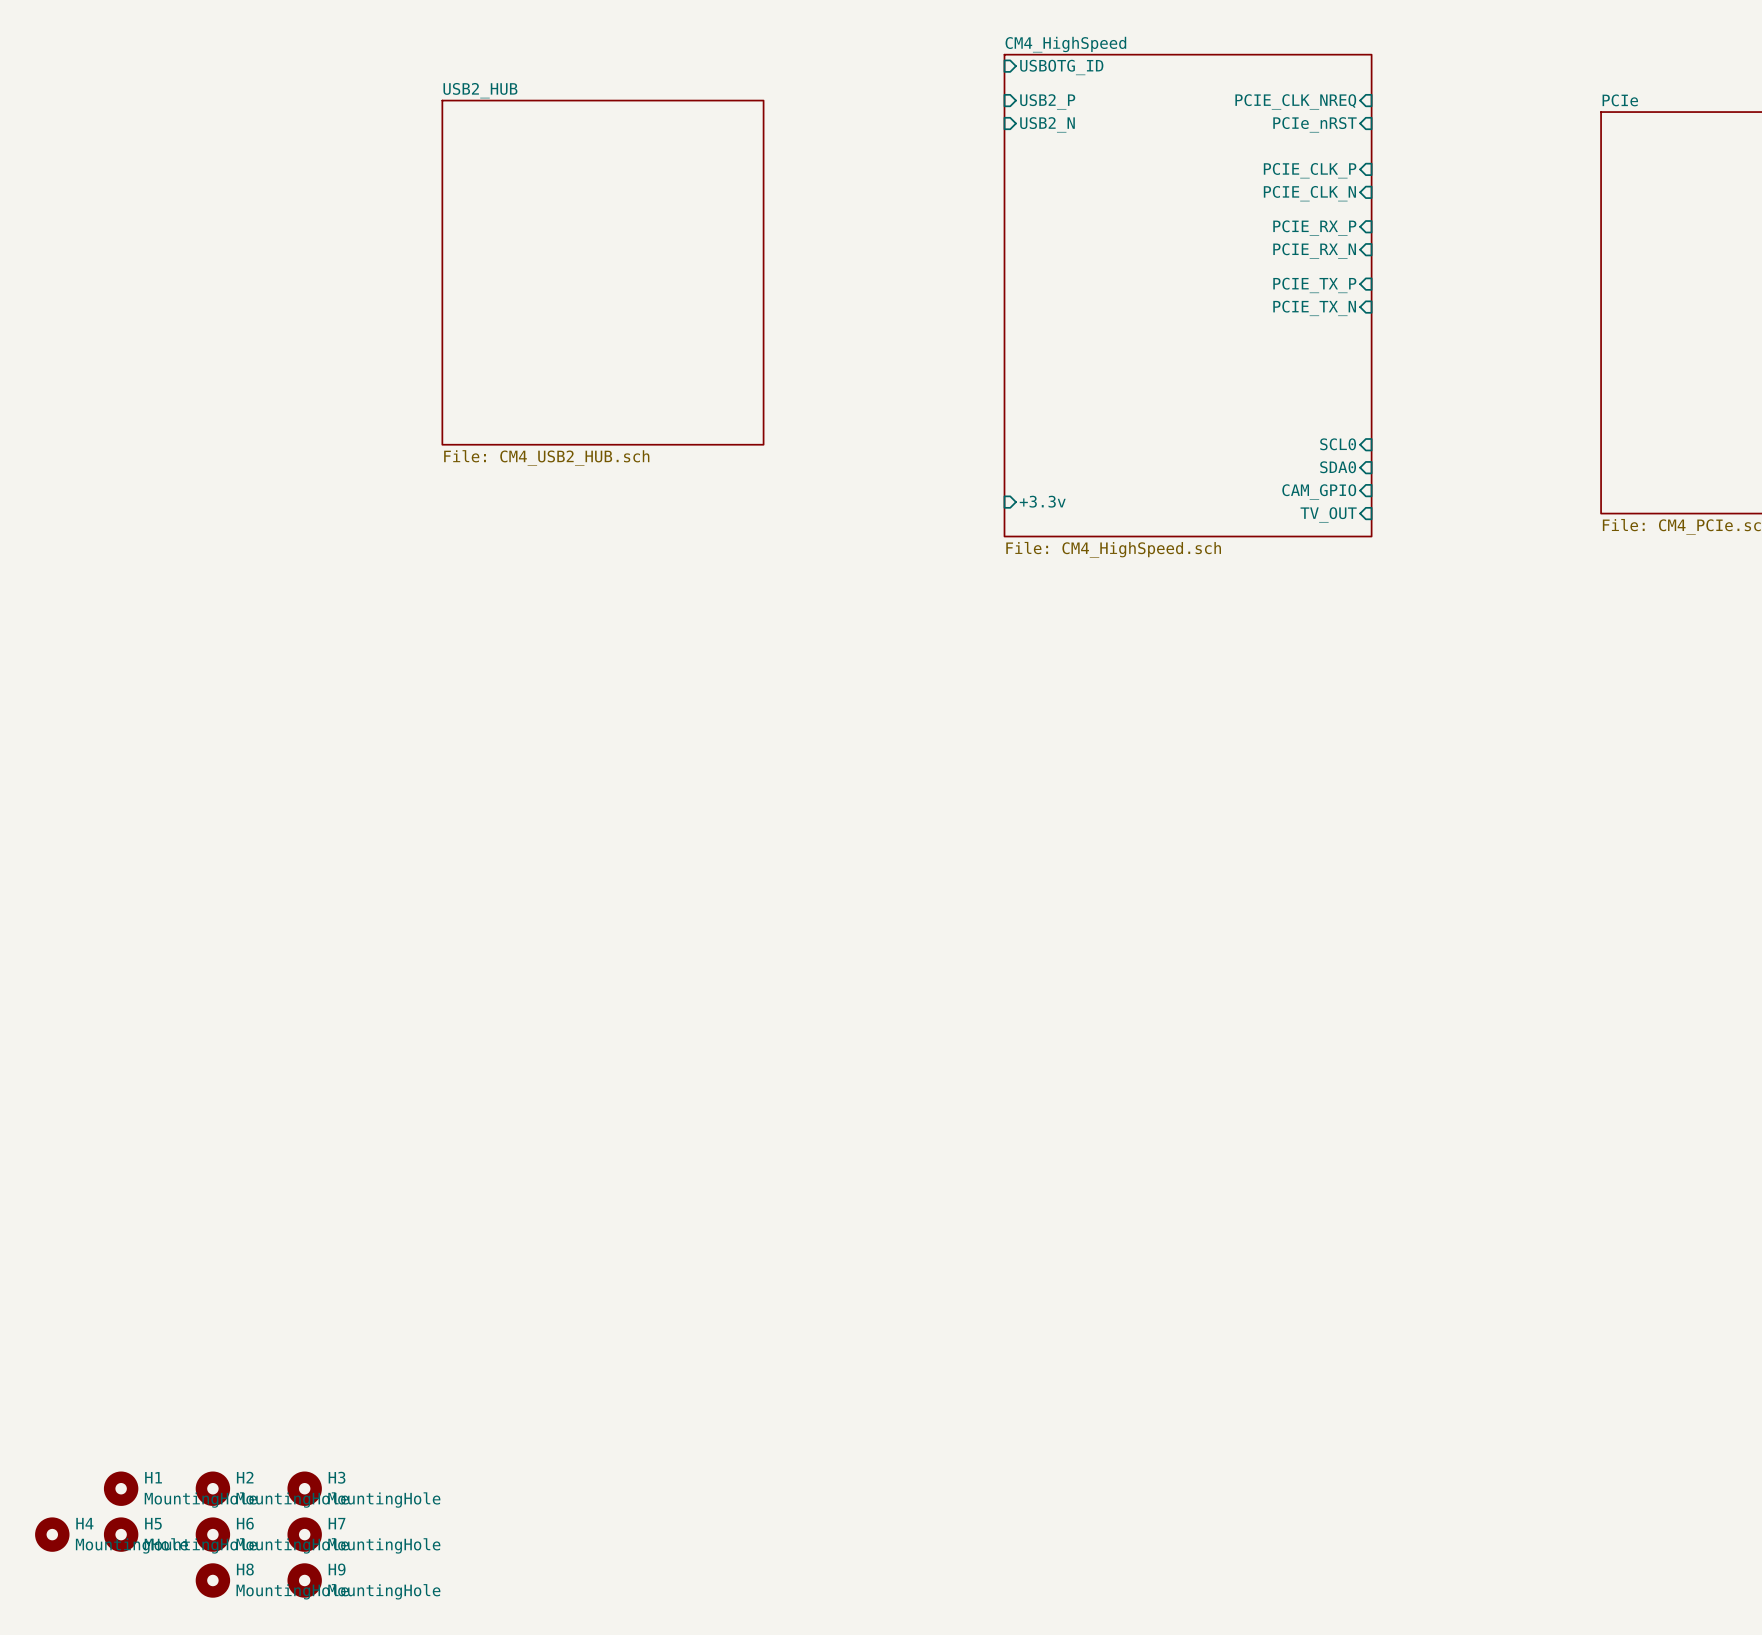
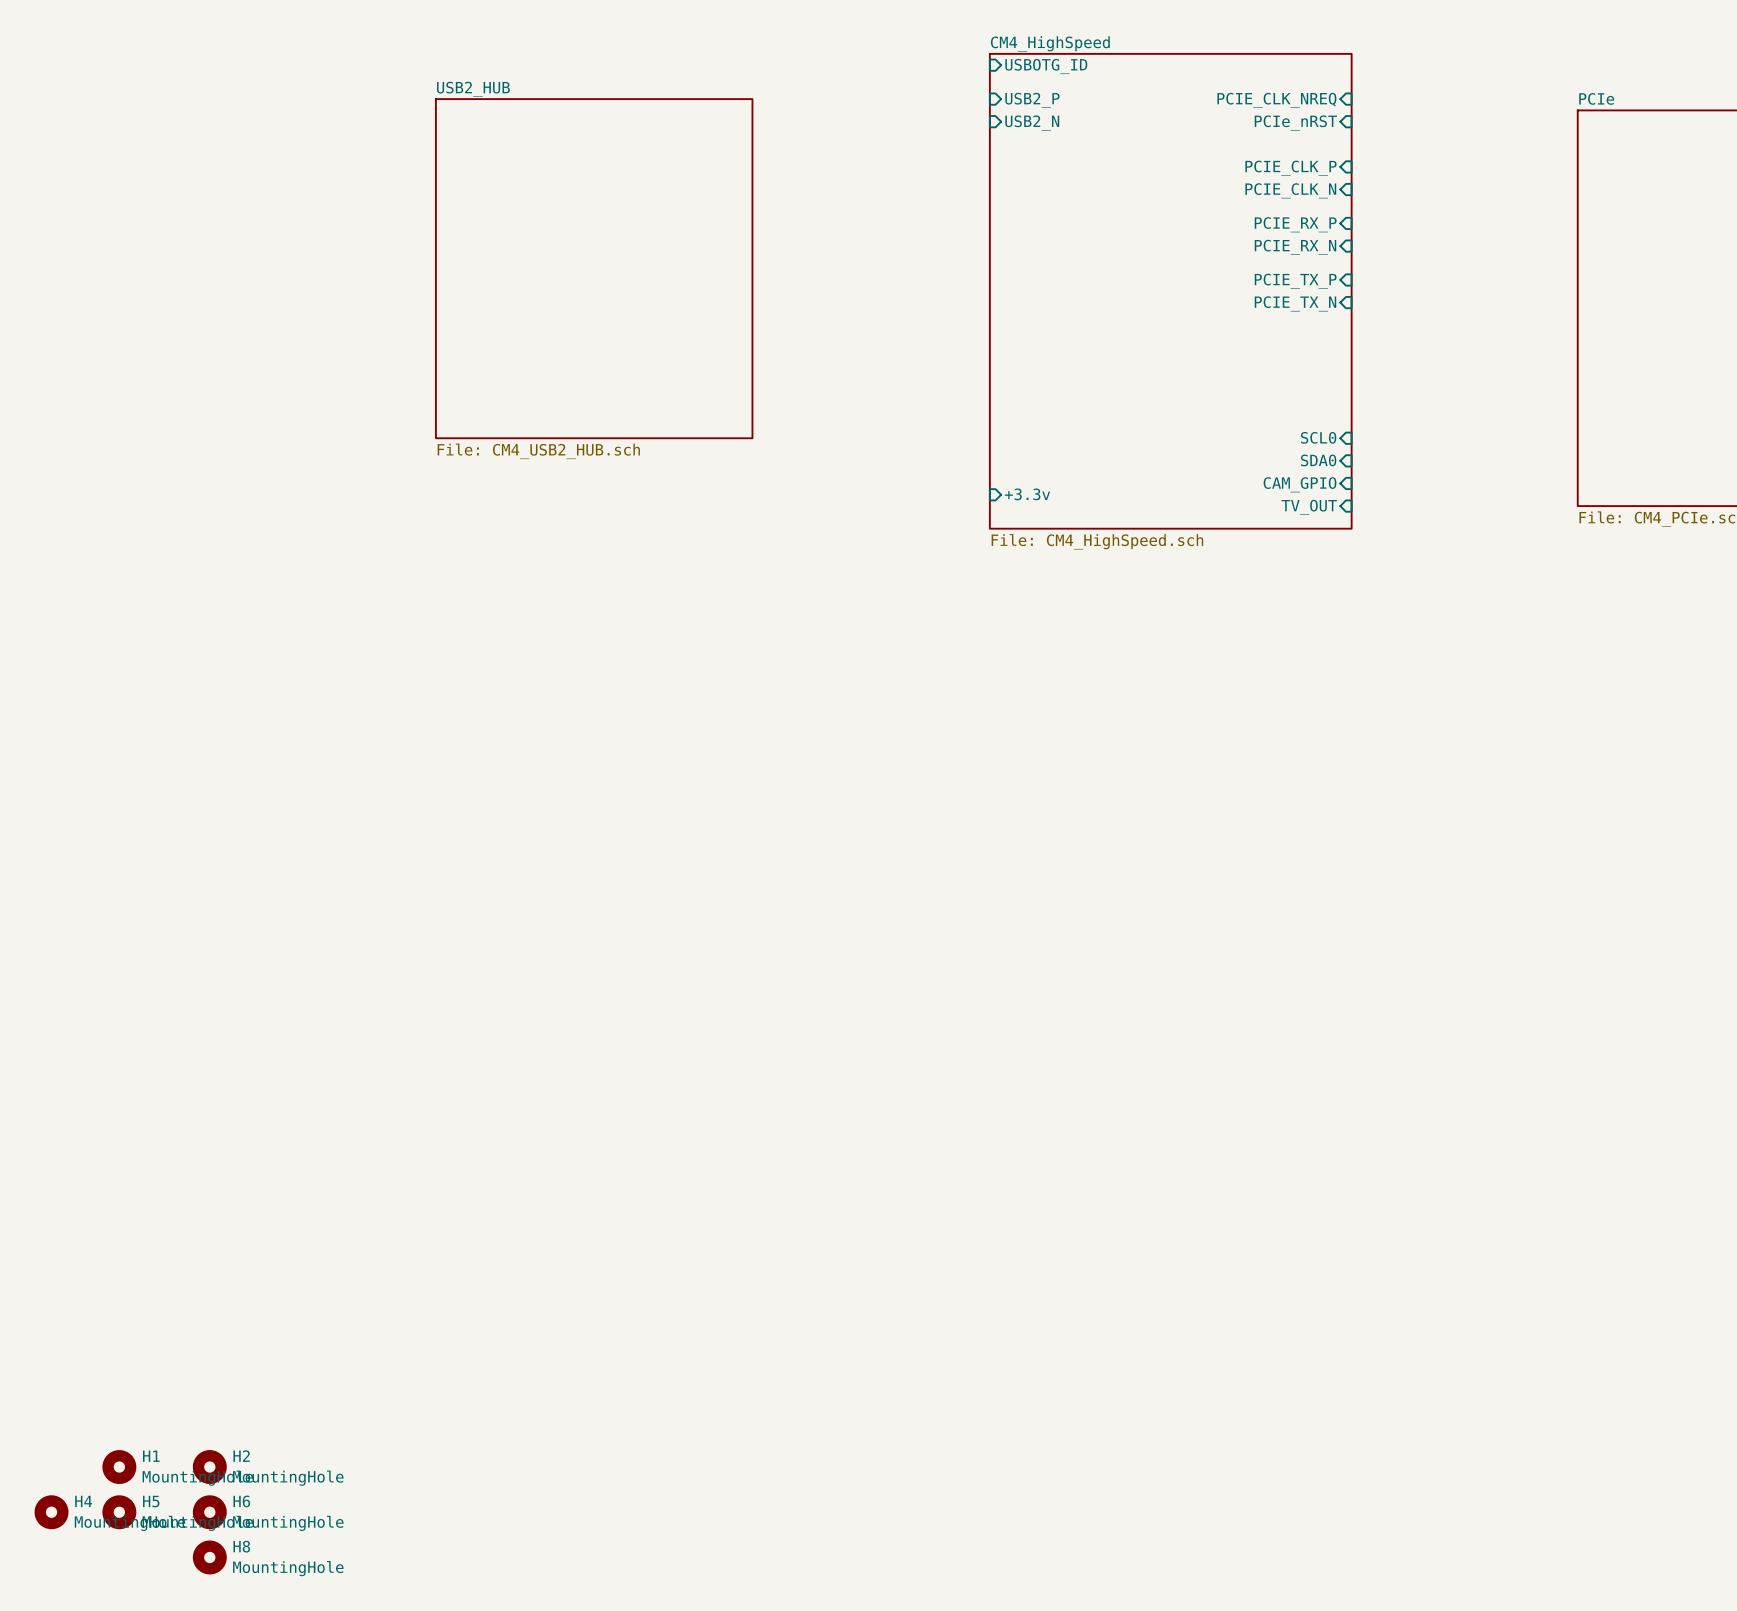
H3: MountingHole (304, 1488) -> none
H7: MountingHole (304, 1534) -> none
H9: MountingHole (304, 1580) -> none

